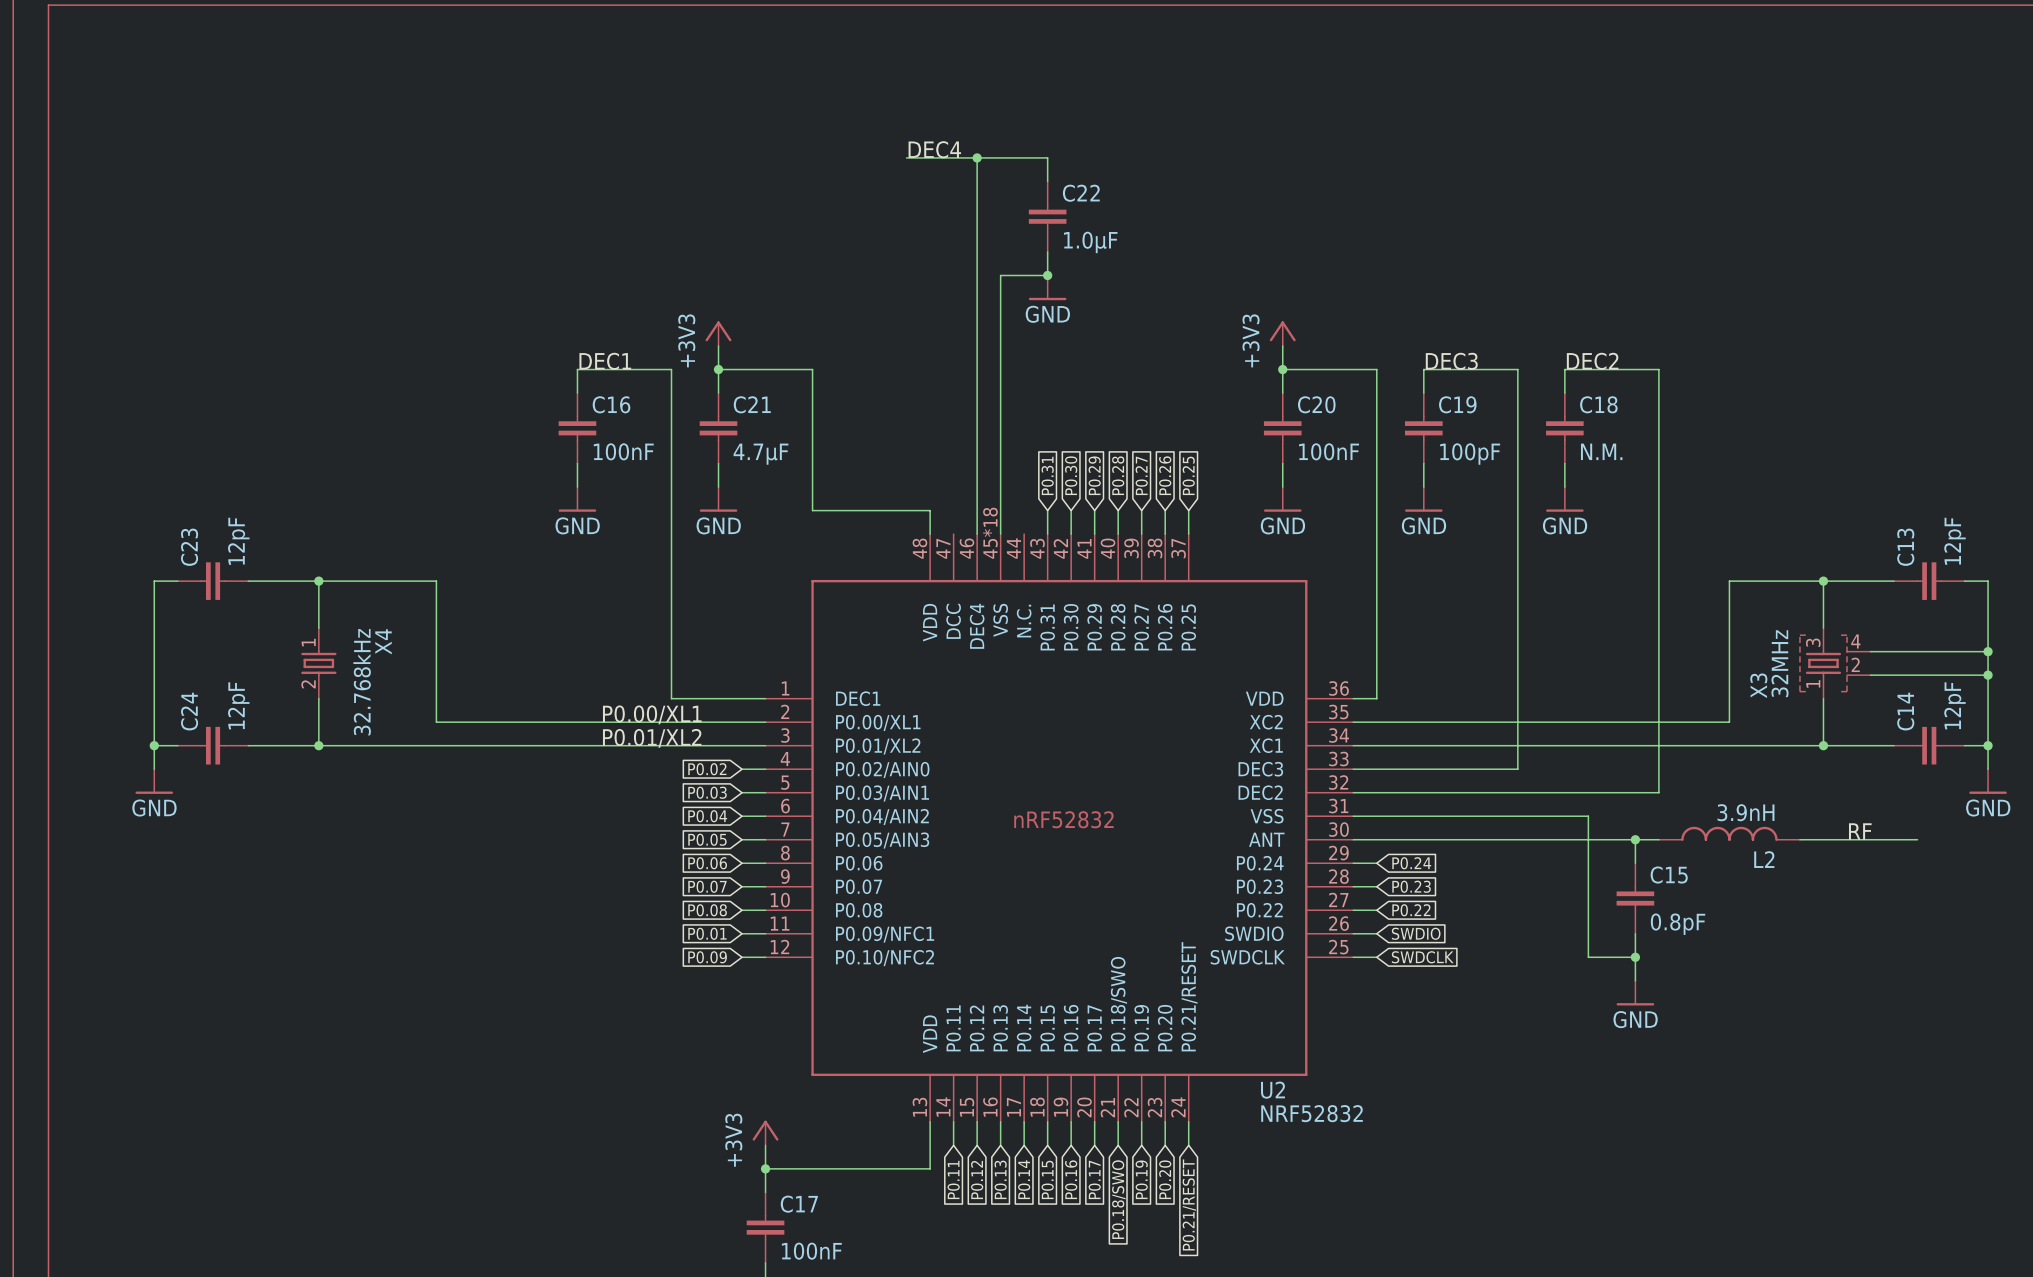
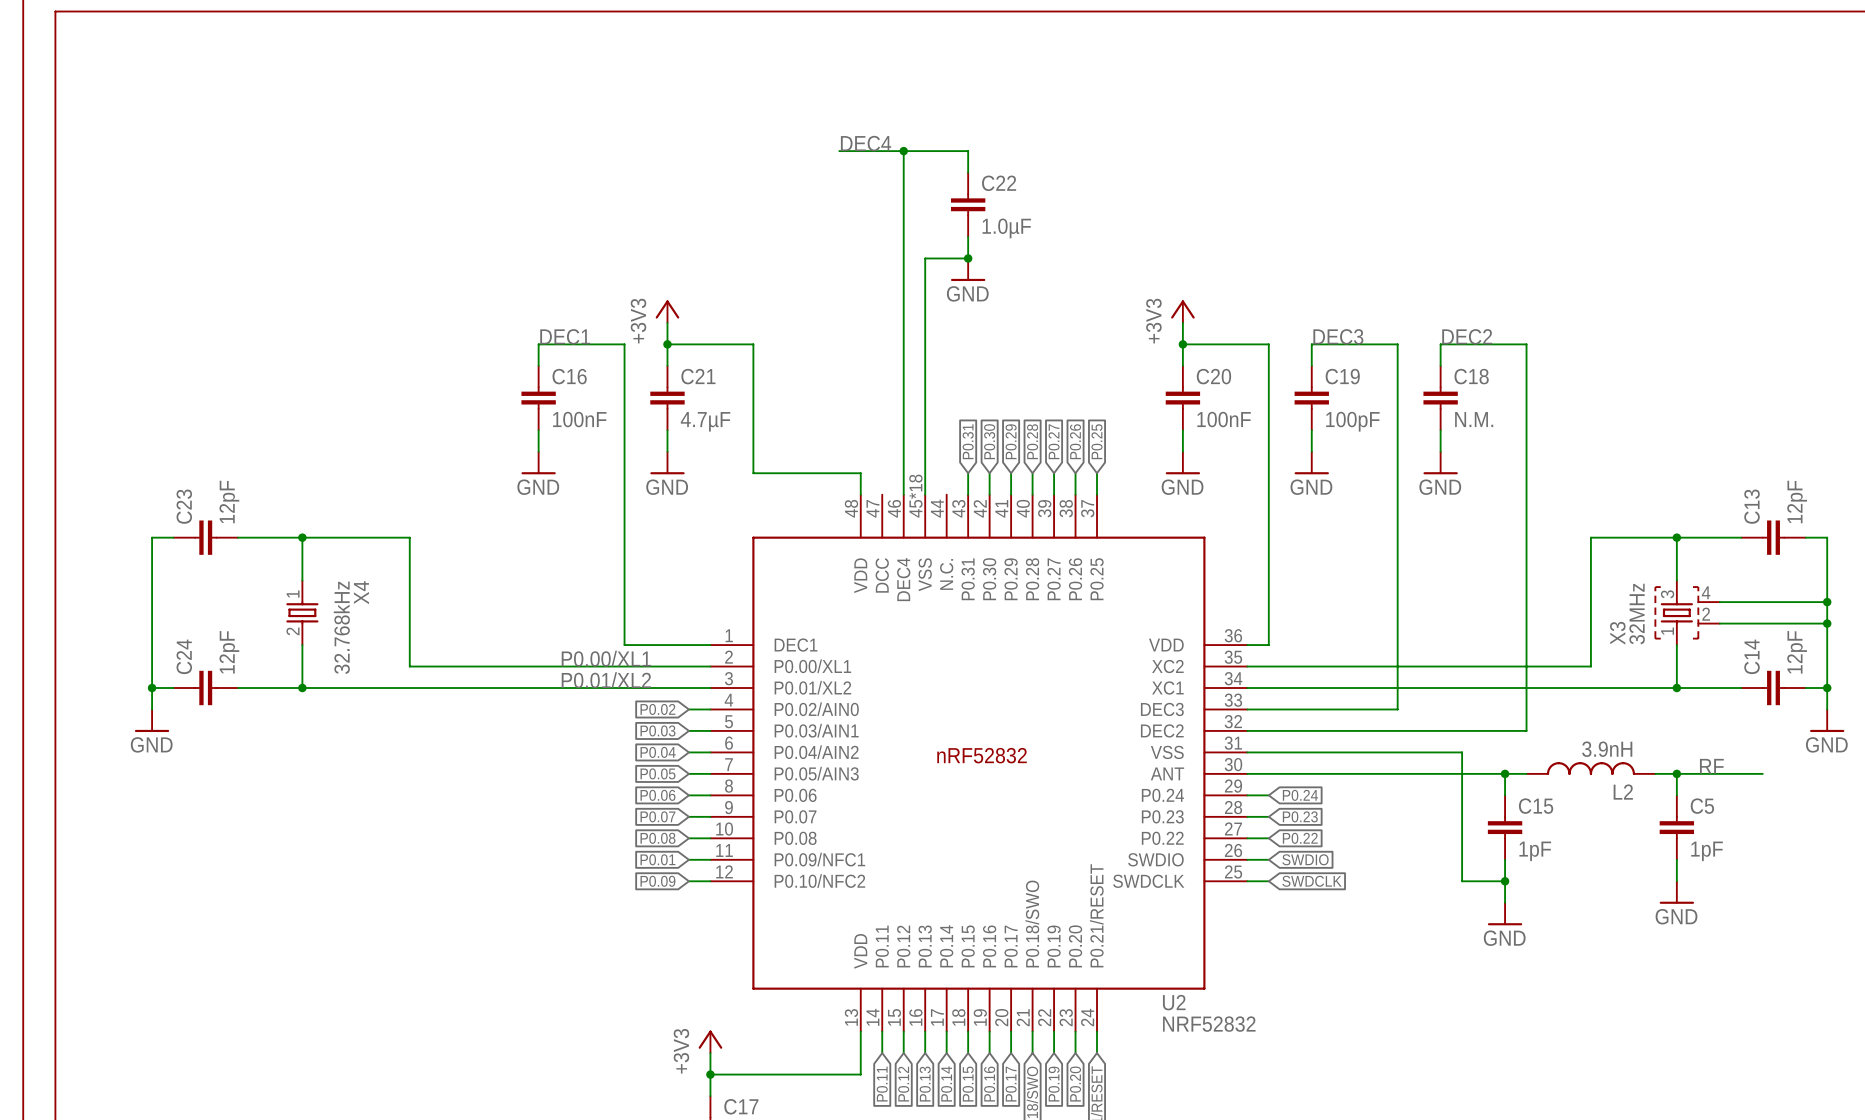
wire: none -> (1676, 773) (1676, 795)
junction: none -> (1676, 773)
C5: none -> 1pF (1676, 827)
C15 value: 0.8pF (1678, 924) -> 1pF (1535, 851)
wire: none -> (1676, 859) (1676, 881)
power symbol: none -> GND (1676, 892)

